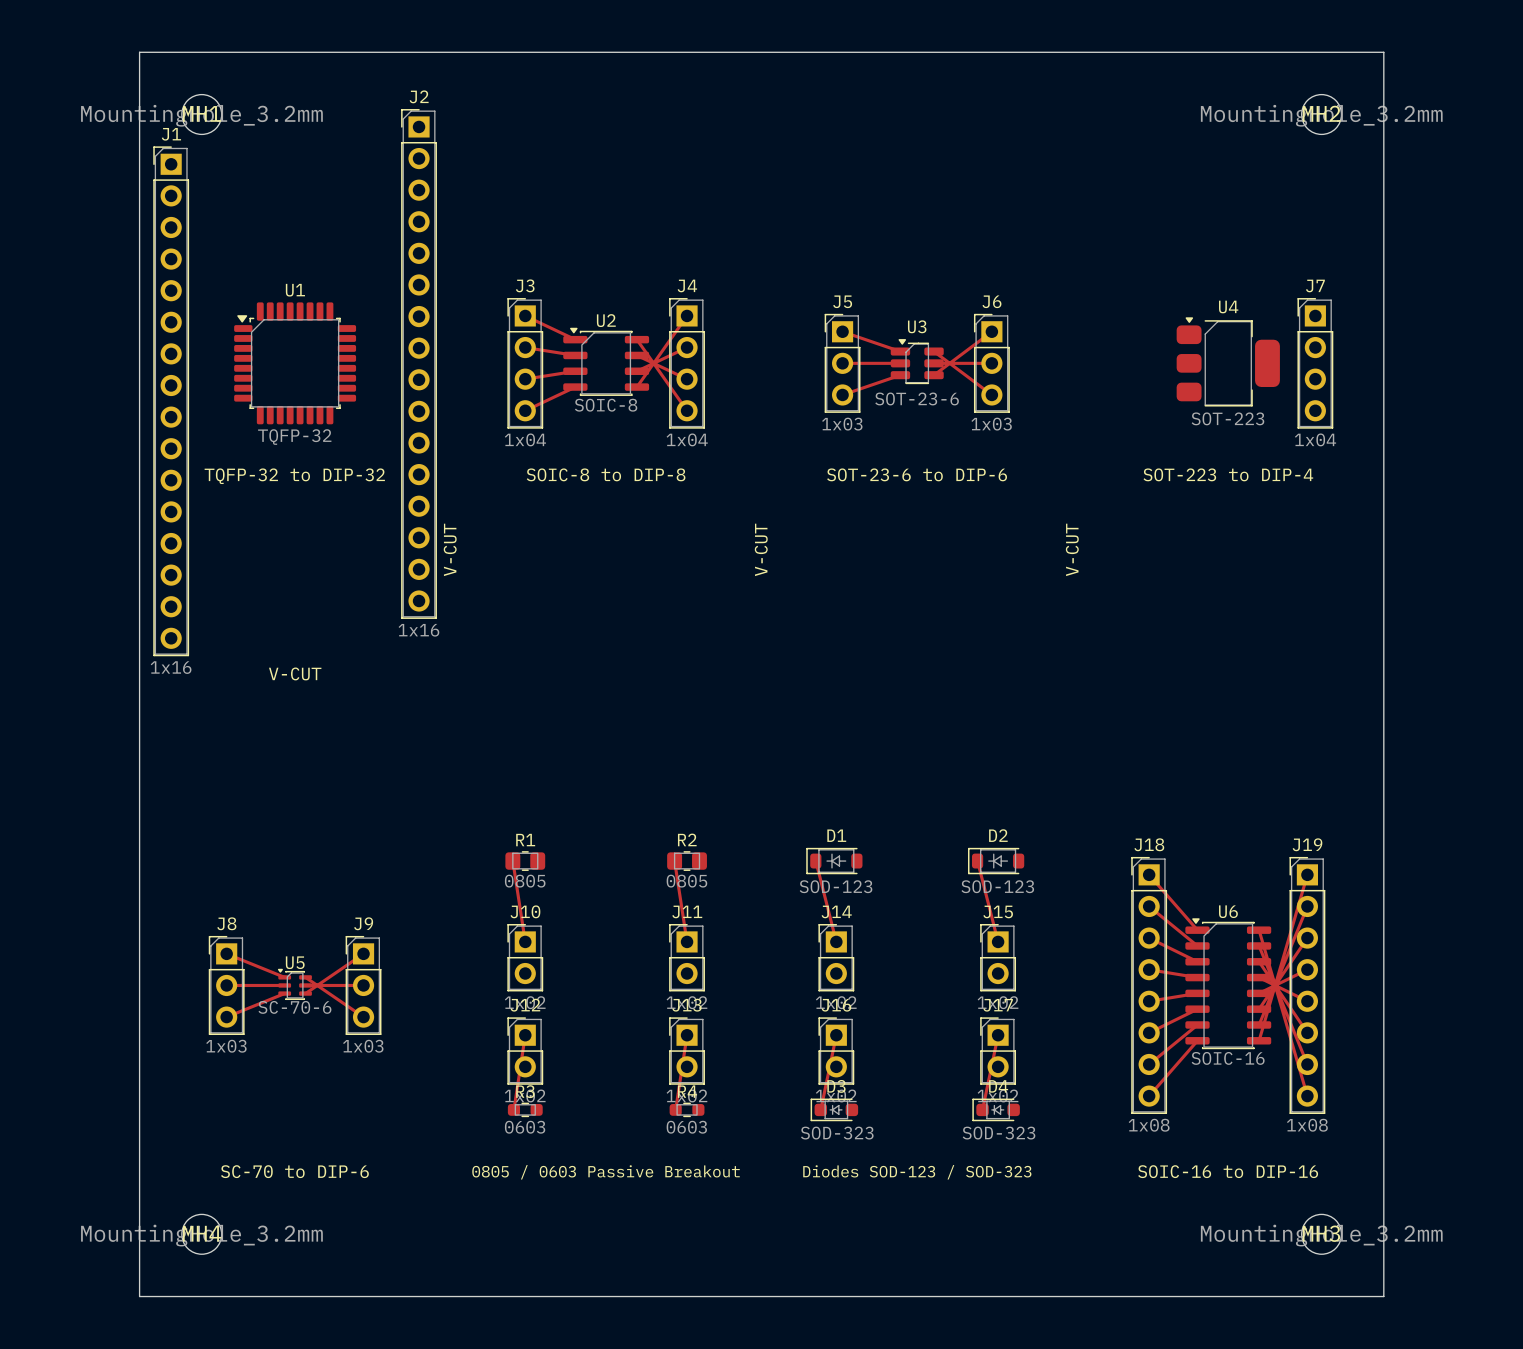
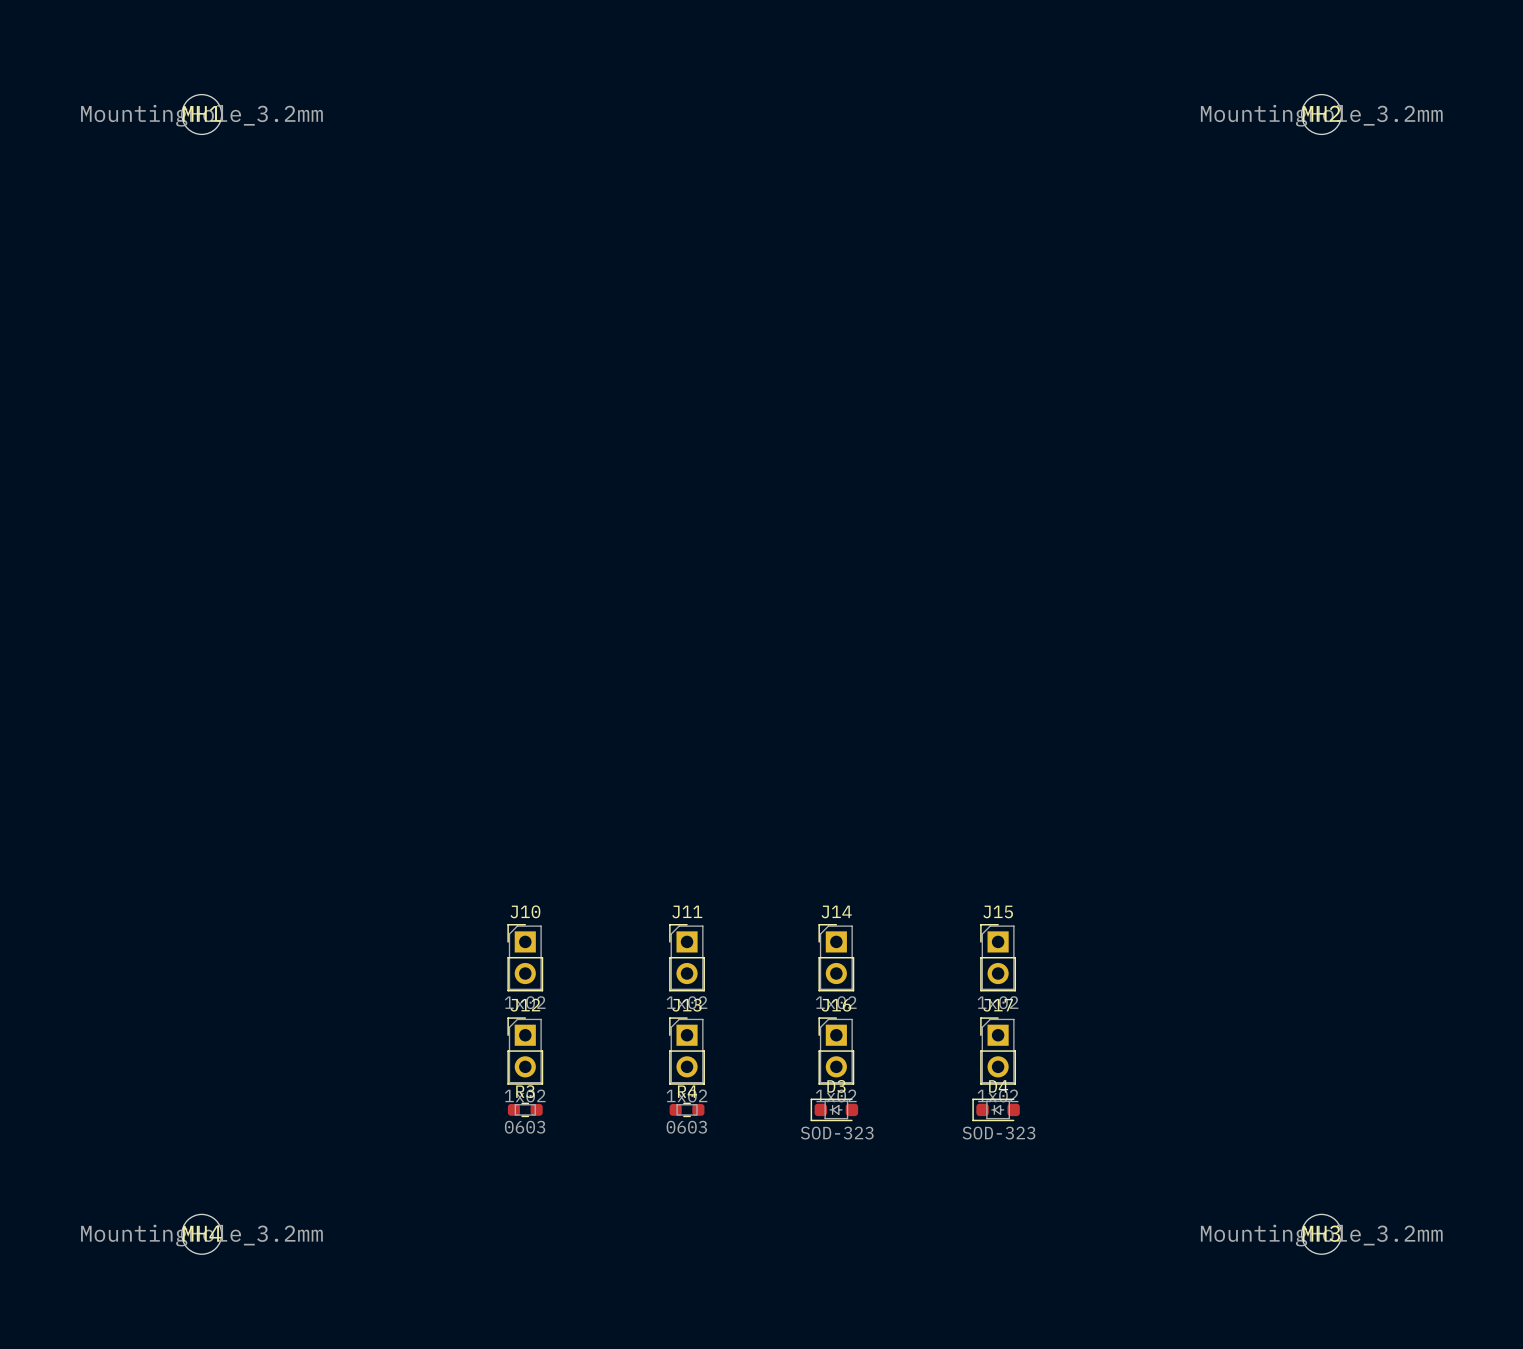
board edge: (139, 52) (1383, 52) (1383, 1296) (139, 1296) (139, 52) -> none
top track: (525, 315) (575, 339) -> none
top track: (687, 315) (636, 387) -> none
top track: (842, 331) (900, 351) -> none
top track: (991, 331) (934, 375) -> none
top track: (636, 339) (687, 410) -> none
top track: (525, 347) (575, 355) -> none
top track: (687, 347) (636, 371) -> none
top track: (934, 351) (991, 394) -> none
top track: (636, 355) (687, 379) -> none
U2: SOIC-8 (606, 361) -> none
U3: SOT-23-6 (917, 361) -> none
U4: SOT-223 (1228, 361) -> none
U1: TQFP-32 (295, 363) -> none
J2: 1x16 (419, 363) -> none
J3: 1x04 (525, 363) -> none
J4: 1x04 (687, 363) -> none
top track: (842, 363) (900, 363) -> none
J5: 1x03 (842, 363) -> none
top track: (934, 363) (991, 363) -> none
J6: 1x03 (991, 363) -> none
J7: 1x04 (1315, 363) -> none
top track: (575, 371) (525, 379) -> none
top track: (900, 375) (842, 394) -> none
top track: (575, 387) (525, 410) -> none
J1: 1x16 (171, 401) -> none
text: SOIC-8 to DIP-8 (606, 474) -> none
text: SOT-23-6 to DIP-6 (917, 474) -> none
text: SOT-223 to DIP-4 (1228, 474) -> none
text: TQFP-32 to DIP-32 (294, 476) -> none
text: V-CUT (450, 549) -> none
text: V-CUT (761, 549) -> none
text: V-CUT (1072, 549) -> none
text: V-CUT (295, 673) -> none
top track: (512, 861) (525, 941) -> none
R1: 0805 (525, 861) -> none
top track: (674, 861) (687, 941) -> none
R2: 0805 (687, 861) -> none
top track: (815, 861) (836, 941) -> none
D1: SOD-123 (834, 861) -> none
top track: (977, 861) (998, 941) -> none
D2: SOD-123 (996, 861) -> none
top track: (1149, 874) (1197, 930) -> none
top track: (1307, 874) (1259, 1040) -> none
top track: (1149, 906) (1197, 945) -> none
top track: (1307, 906) (1259, 1024) -> none
top track: (1259, 930) (1307, 1096) -> none
top track: (1149, 938) (1197, 961) -> none
top track: (1307, 938) (1259, 1009) -> none
top track: (1259, 945) (1307, 1064) -> none
top track: (226, 953) (284, 977) -> none
top track: (363, 953) (305, 993) -> none
top track: (1259, 961) (1307, 1032) -> none
top track: (1149, 969) (1197, 977) -> none
top track: (1307, 969) (1259, 993) -> none
top track: (305, 977) (363, 1017) -> none
top track: (1259, 977) (1307, 1001) -> none
U6: SOIC-16 (1228, 983) -> none
U5: SC-70-6 (294, 984) -> none
top track: (226, 985) (284, 985) -> none
J8: 1x03 (226, 985) -> none
top track: (305, 985) (363, 985) -> none
J9: 1x03 (363, 985) -> none
J18: 1x08 (1149, 985) -> none
J19: 1x08 (1307, 985) -> none
top track: (284, 993) (226, 1017) -> none
top track: (1197, 993) (1149, 1001) -> none
top track: (1197, 1009) (1149, 1032) -> none
top track: (1197, 1024) (1149, 1064) -> none
top track: (525, 1035) (513, 1109) -> none
top track: (687, 1035) (675, 1109) -> none
top track: (836, 1035) (820, 1109) -> none
top track: (998, 1035) (982, 1109) -> none
top track: (1197, 1040) (1149, 1096) -> none
text: SC-70 to DIP-6 (294, 1171) -> none
text: SOIC-16 to DIP-16 (1228, 1171) -> none
text: 0805 / 0603 Passive Breakout (606, 1172) -> none
text: Diodes SOD-123 / SOD-323 (917, 1172) -> none

